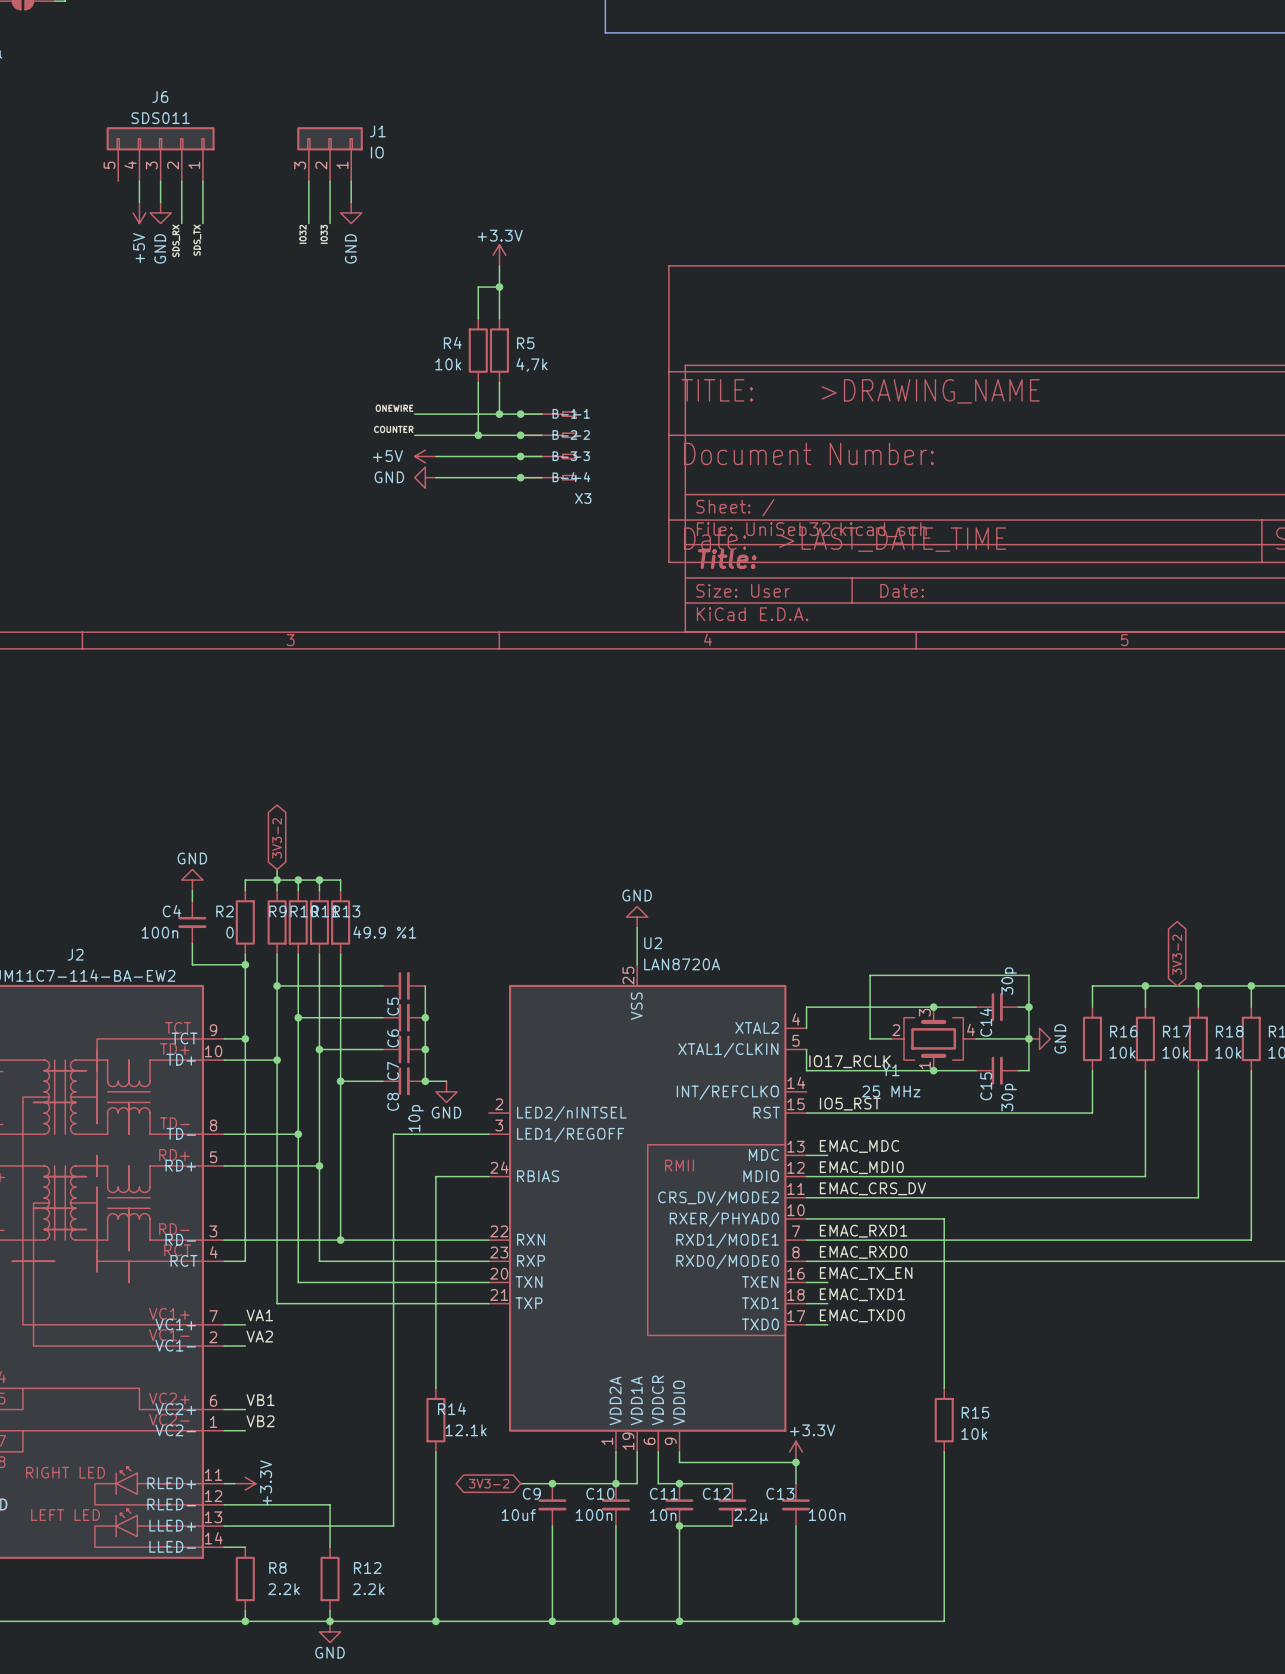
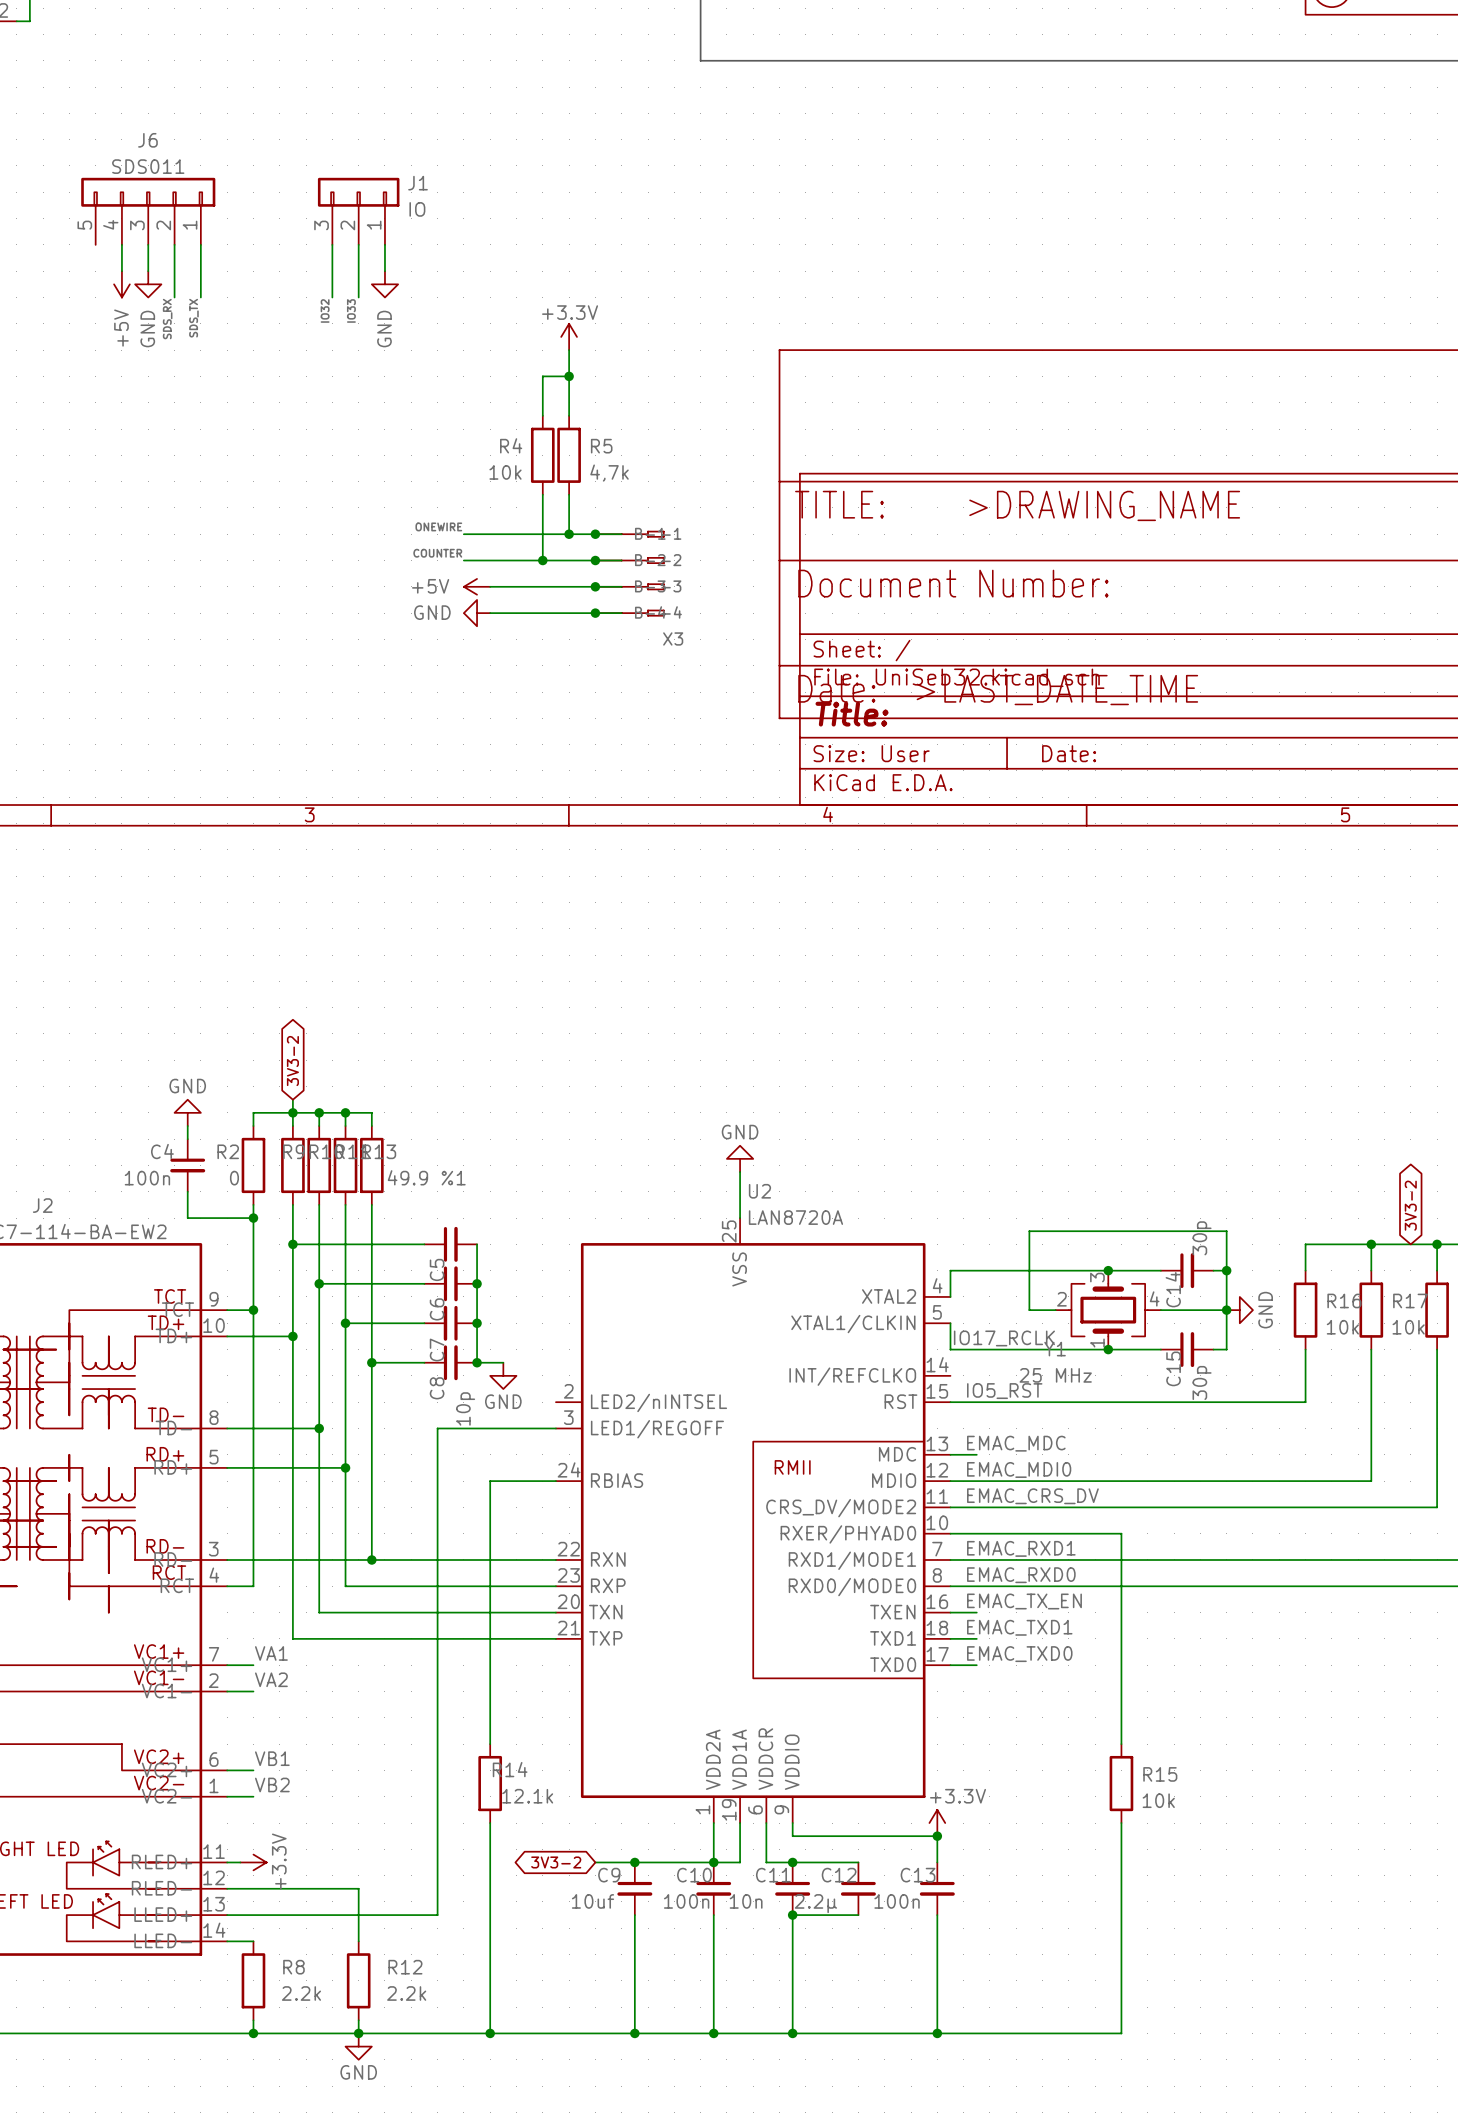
C11 value position: 10n (663, 1515) -> 10n (746, 1901)
C13 value position: 100n (827, 1515) -> 100n (897, 1901)
C12 value position: 2.2µ (751, 1516) -> 2.2µ (815, 1903)

